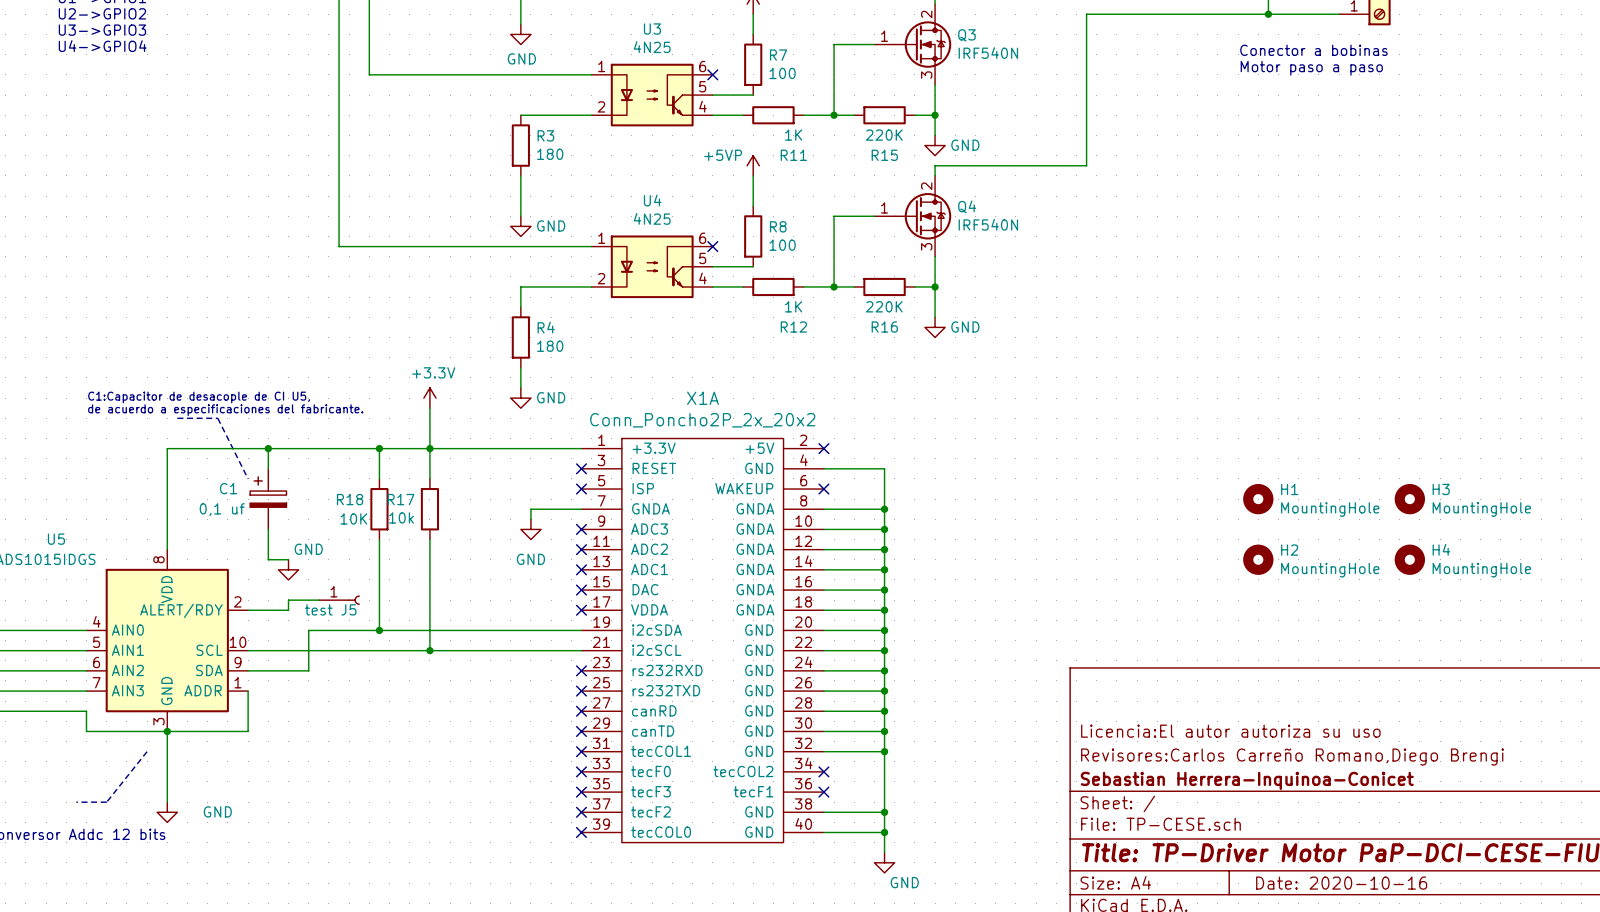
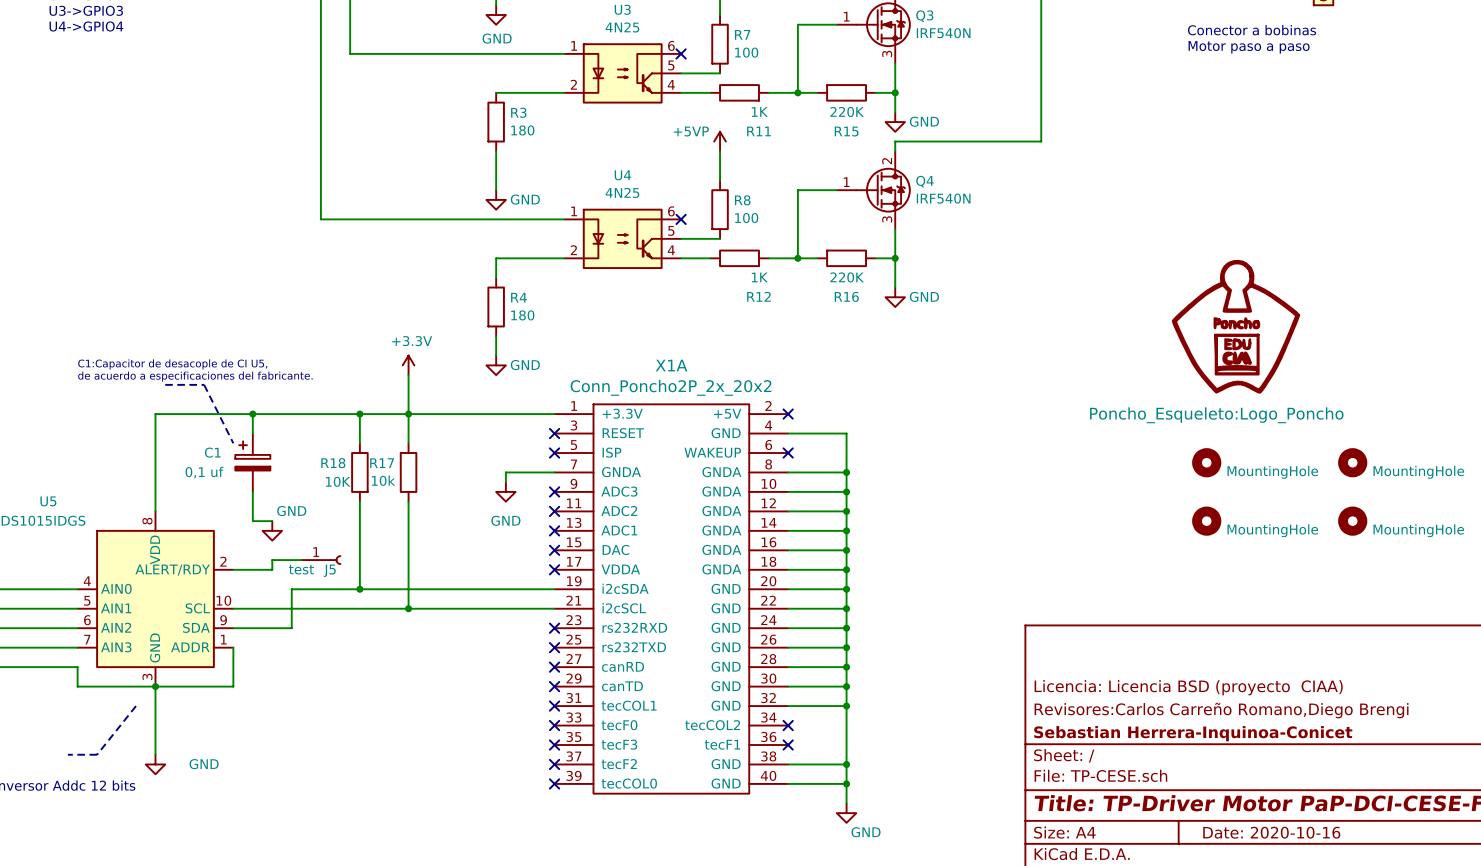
power symbol: none -> (1236, 326)
H1 name: H1 (1289, 489) -> none
H3 name: H3 (1441, 489) -> none
H4 name: H4 (1441, 549) -> none
H2 name: H2 (1289, 550) -> none
title block: Licencia:El autor autoriza su uso (1230, 731) -> Licencia: Licencia BSD (proyecto CIAA) (1188, 687)

